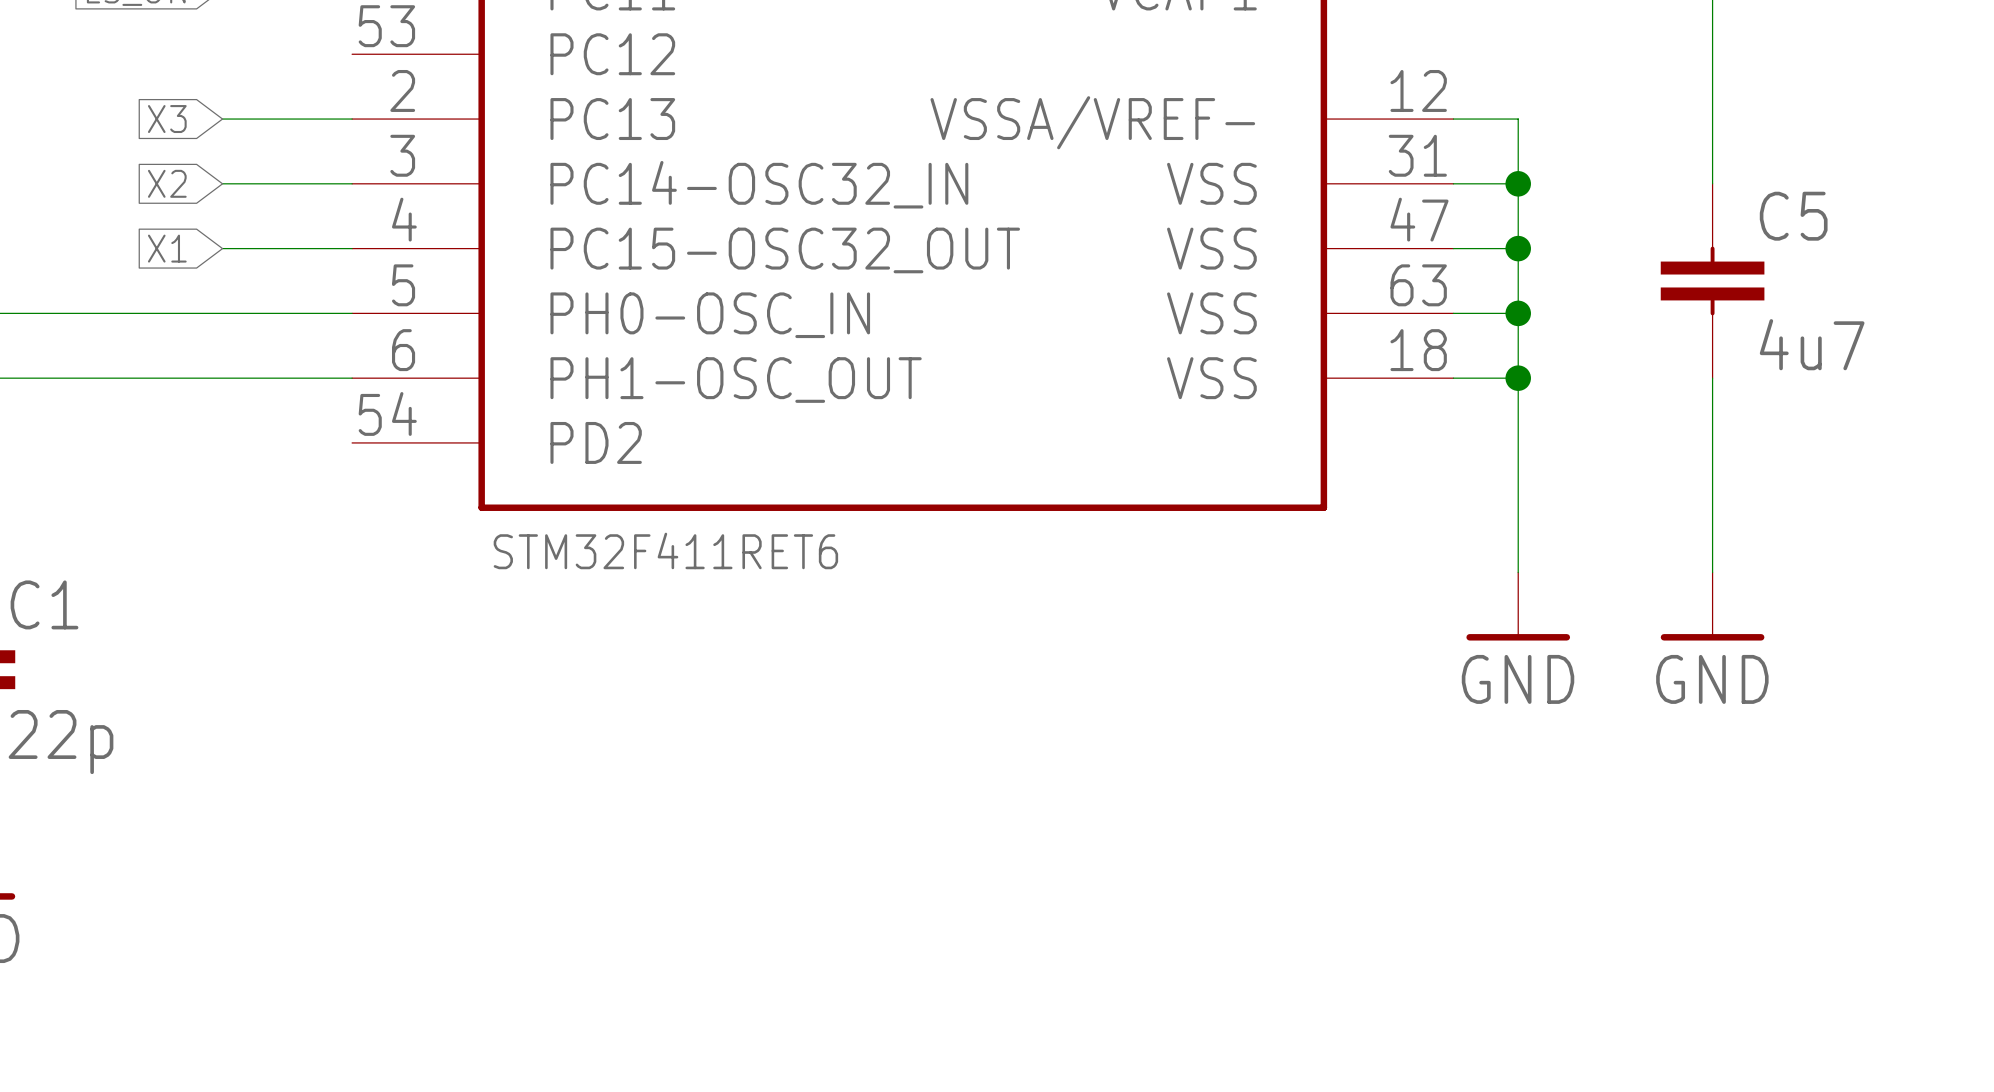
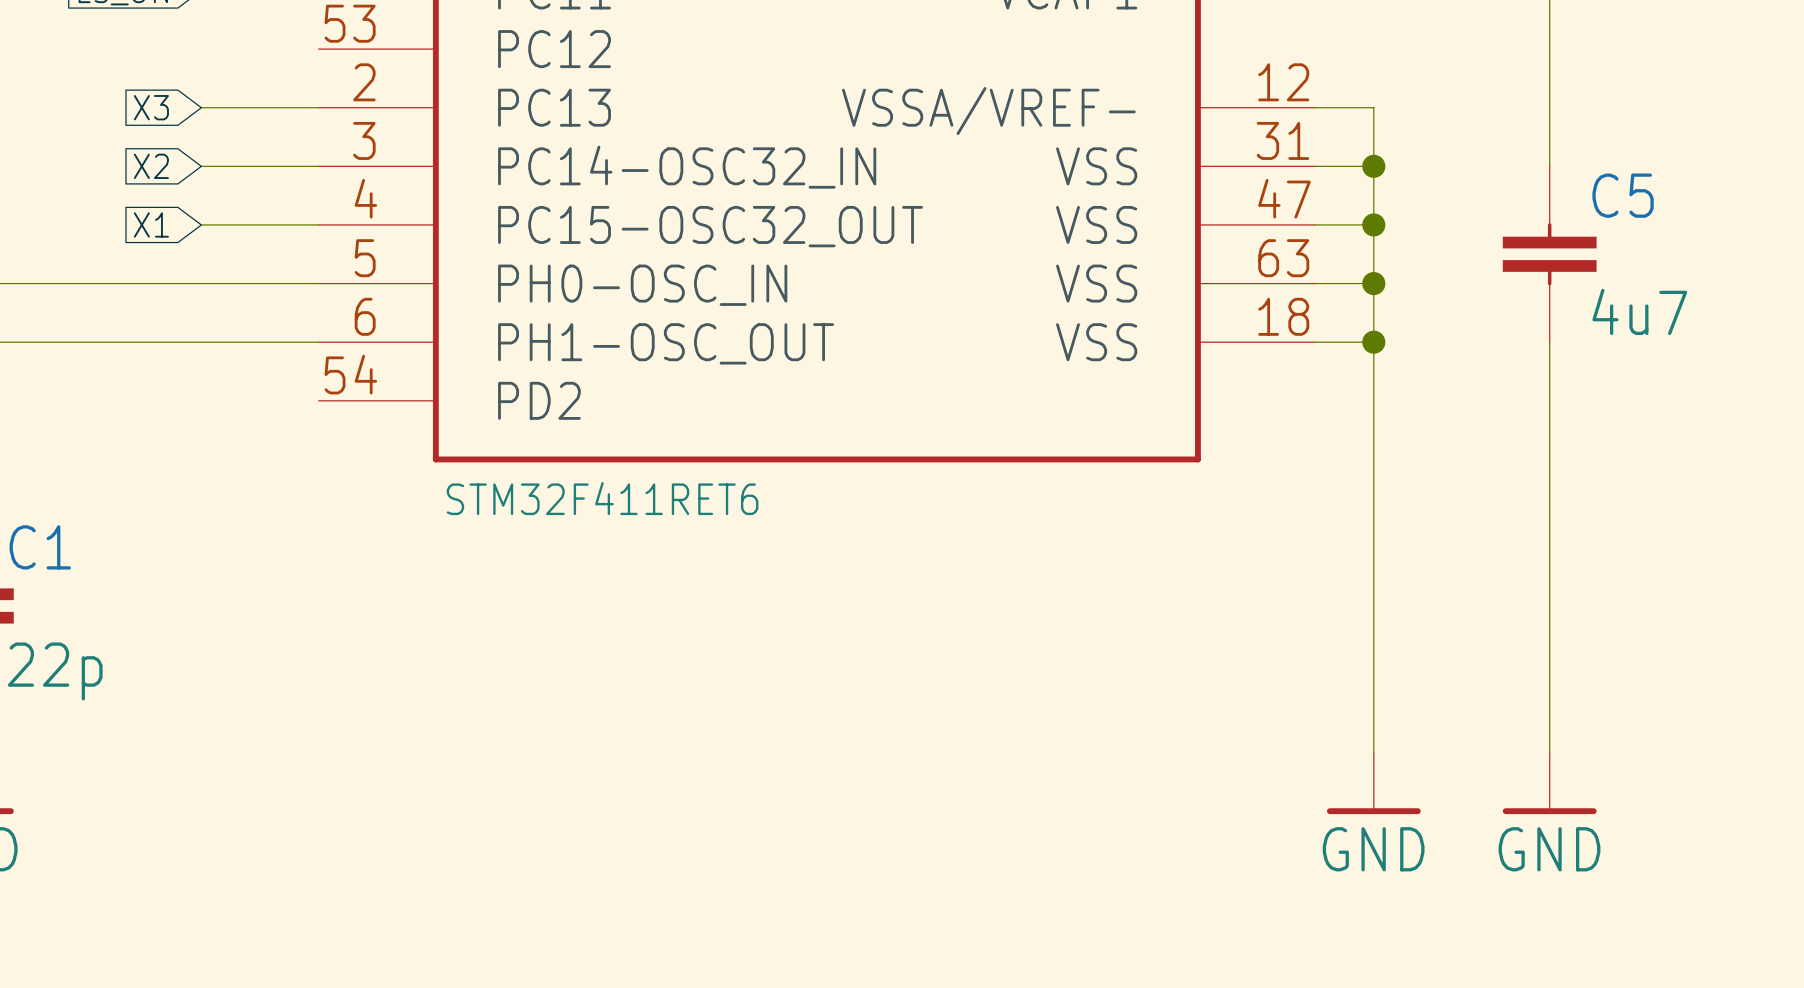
wire: none -> (1373, 518) (1373, 752)
wire: none -> (1549, 518) (1549, 752)
power symbol: GND (1518, 606) -> none
power symbol: GND (1712, 606) -> none
power symbol: none -> GND (1373, 783)
power symbol: none -> GND (1549, 783)

